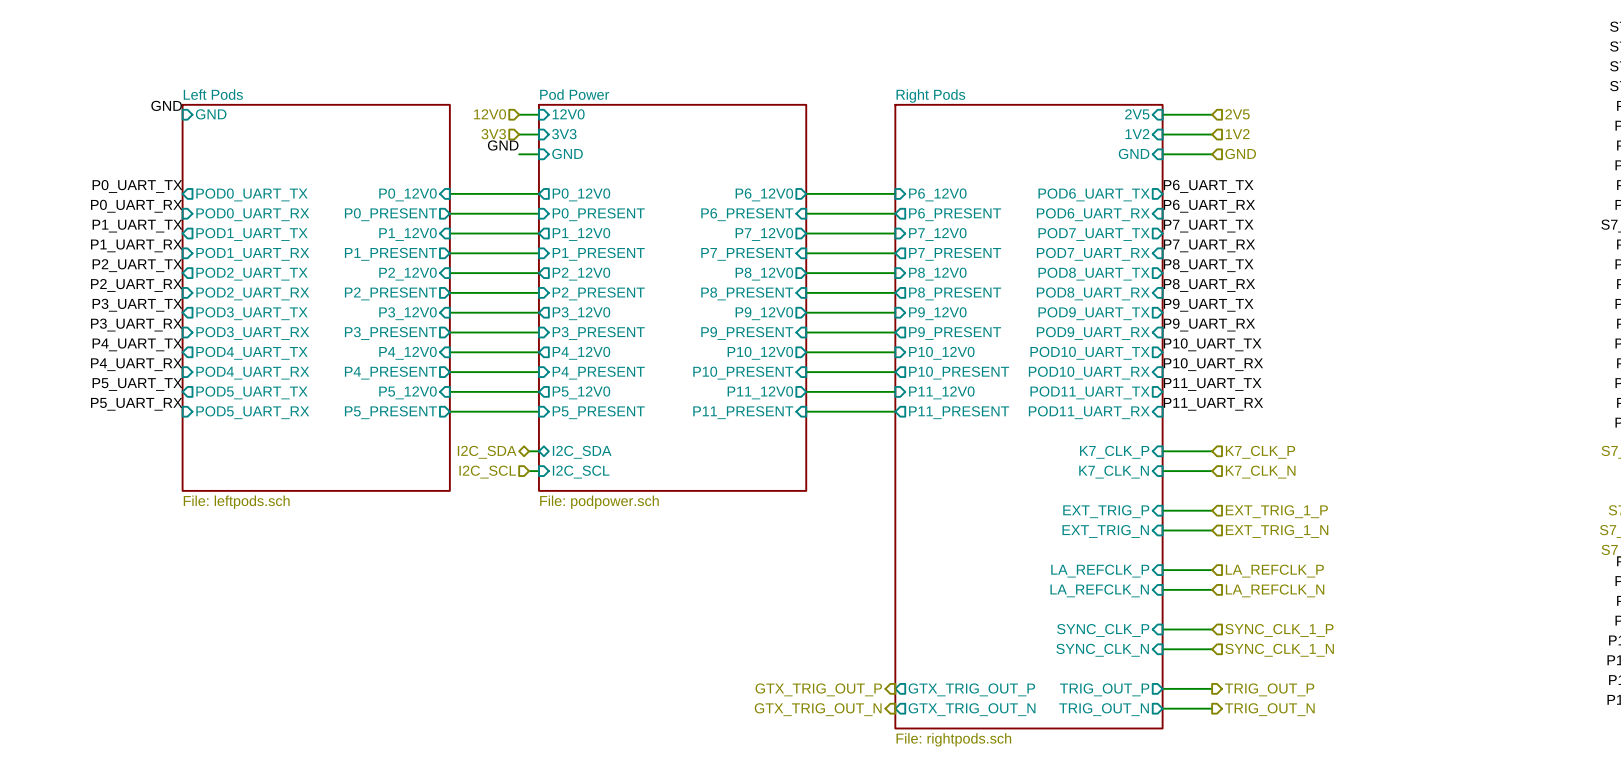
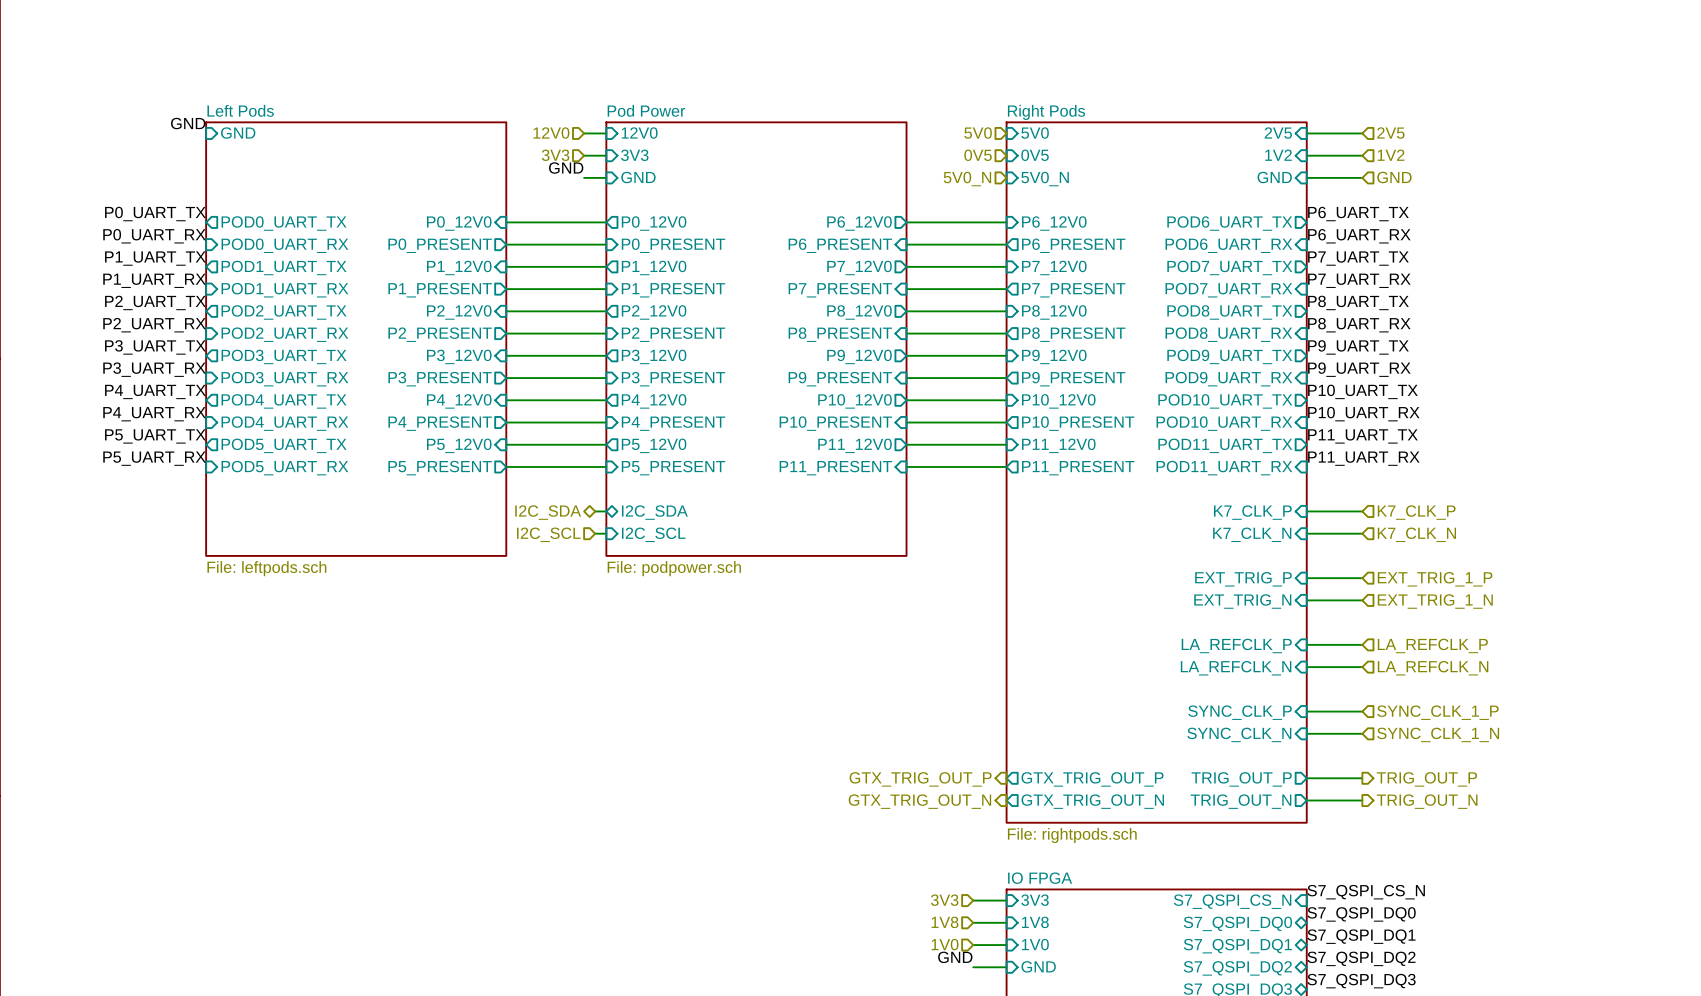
hierarchical label: none -> 5V0 (978, 133)
sheet pin: none -> 5V0 (1035, 133)
hierarchical label: none -> 0V5 (978, 155)
sheet pin: none -> 0V5 (1035, 155)
hierarchical label: none -> 5V0_N (967, 179)
sheet pin: none -> 5V0_N (1045, 179)

